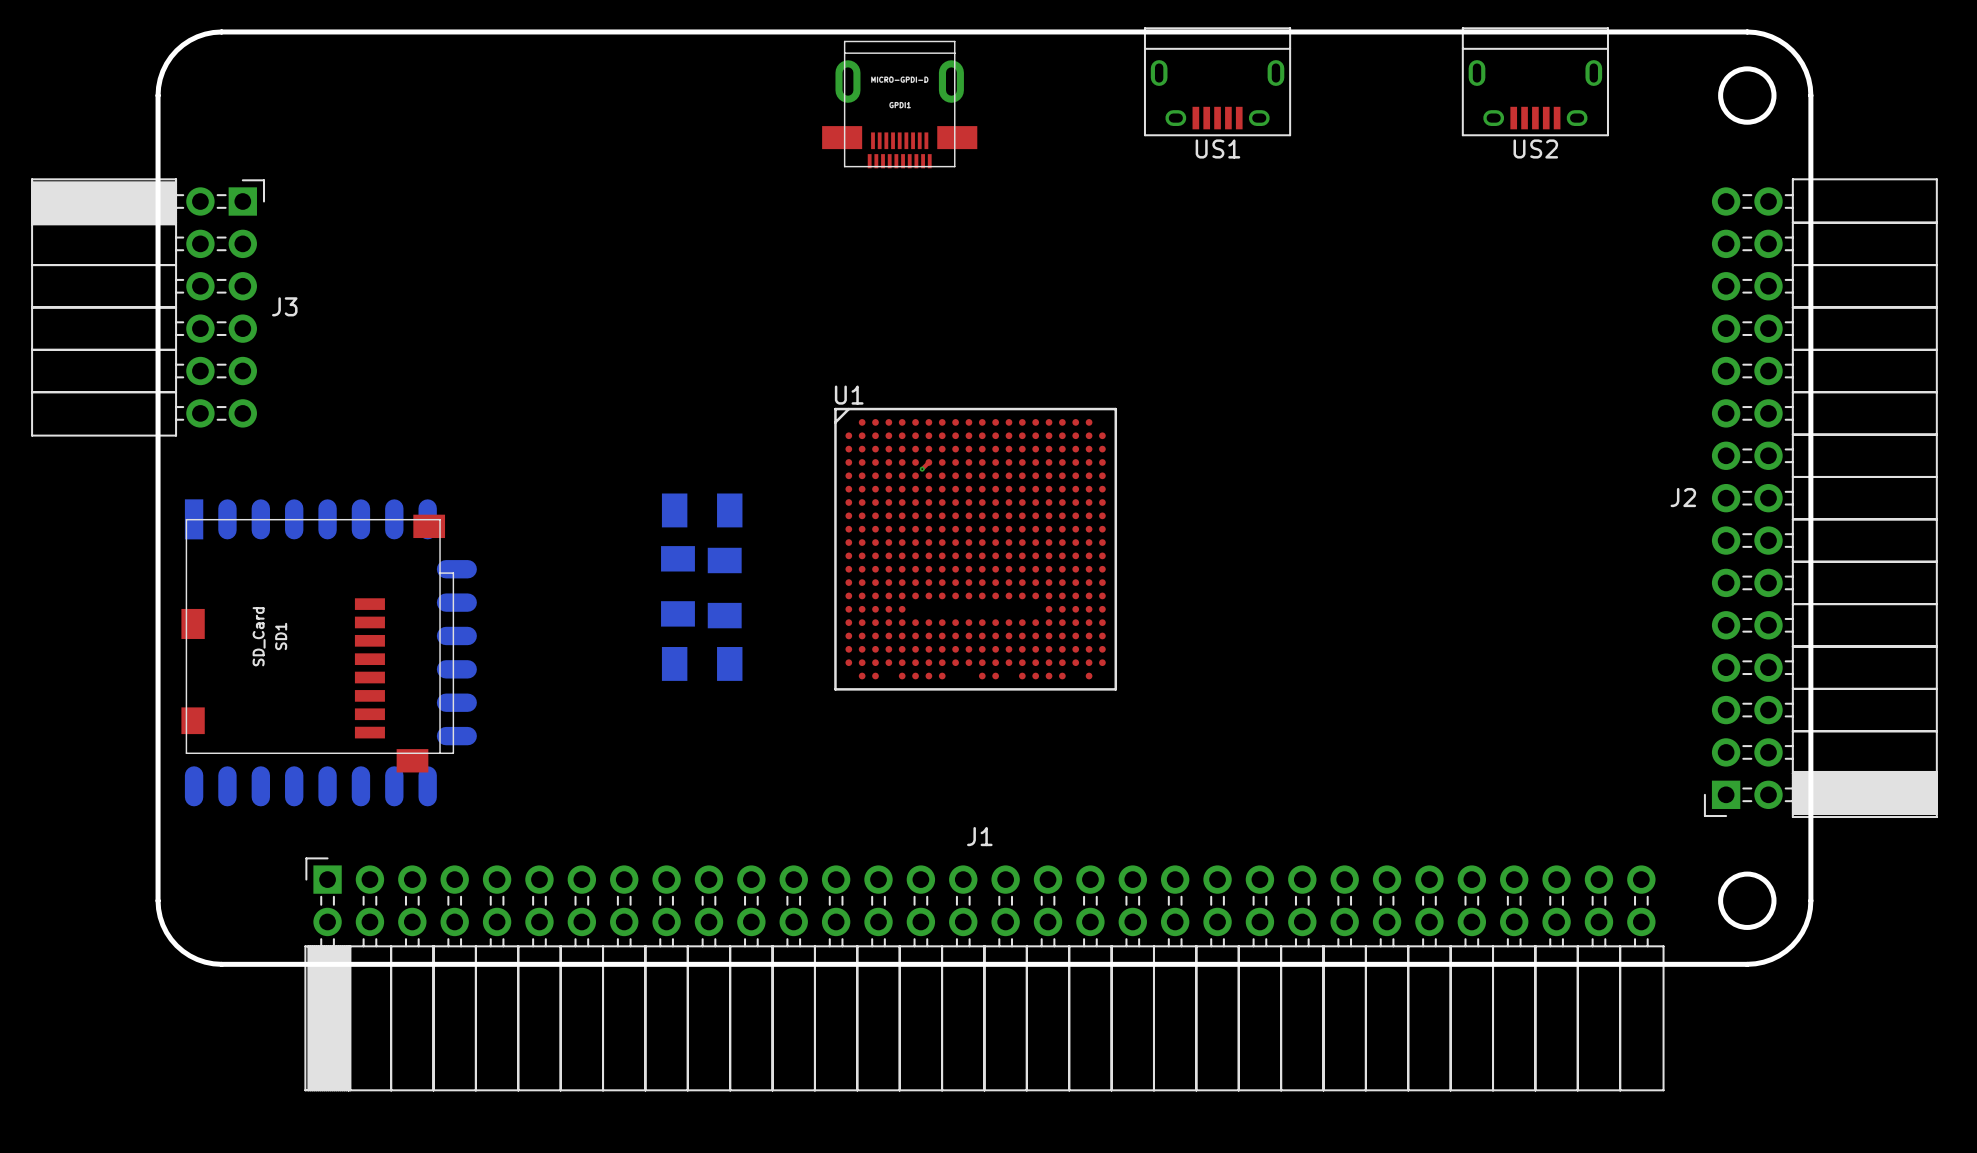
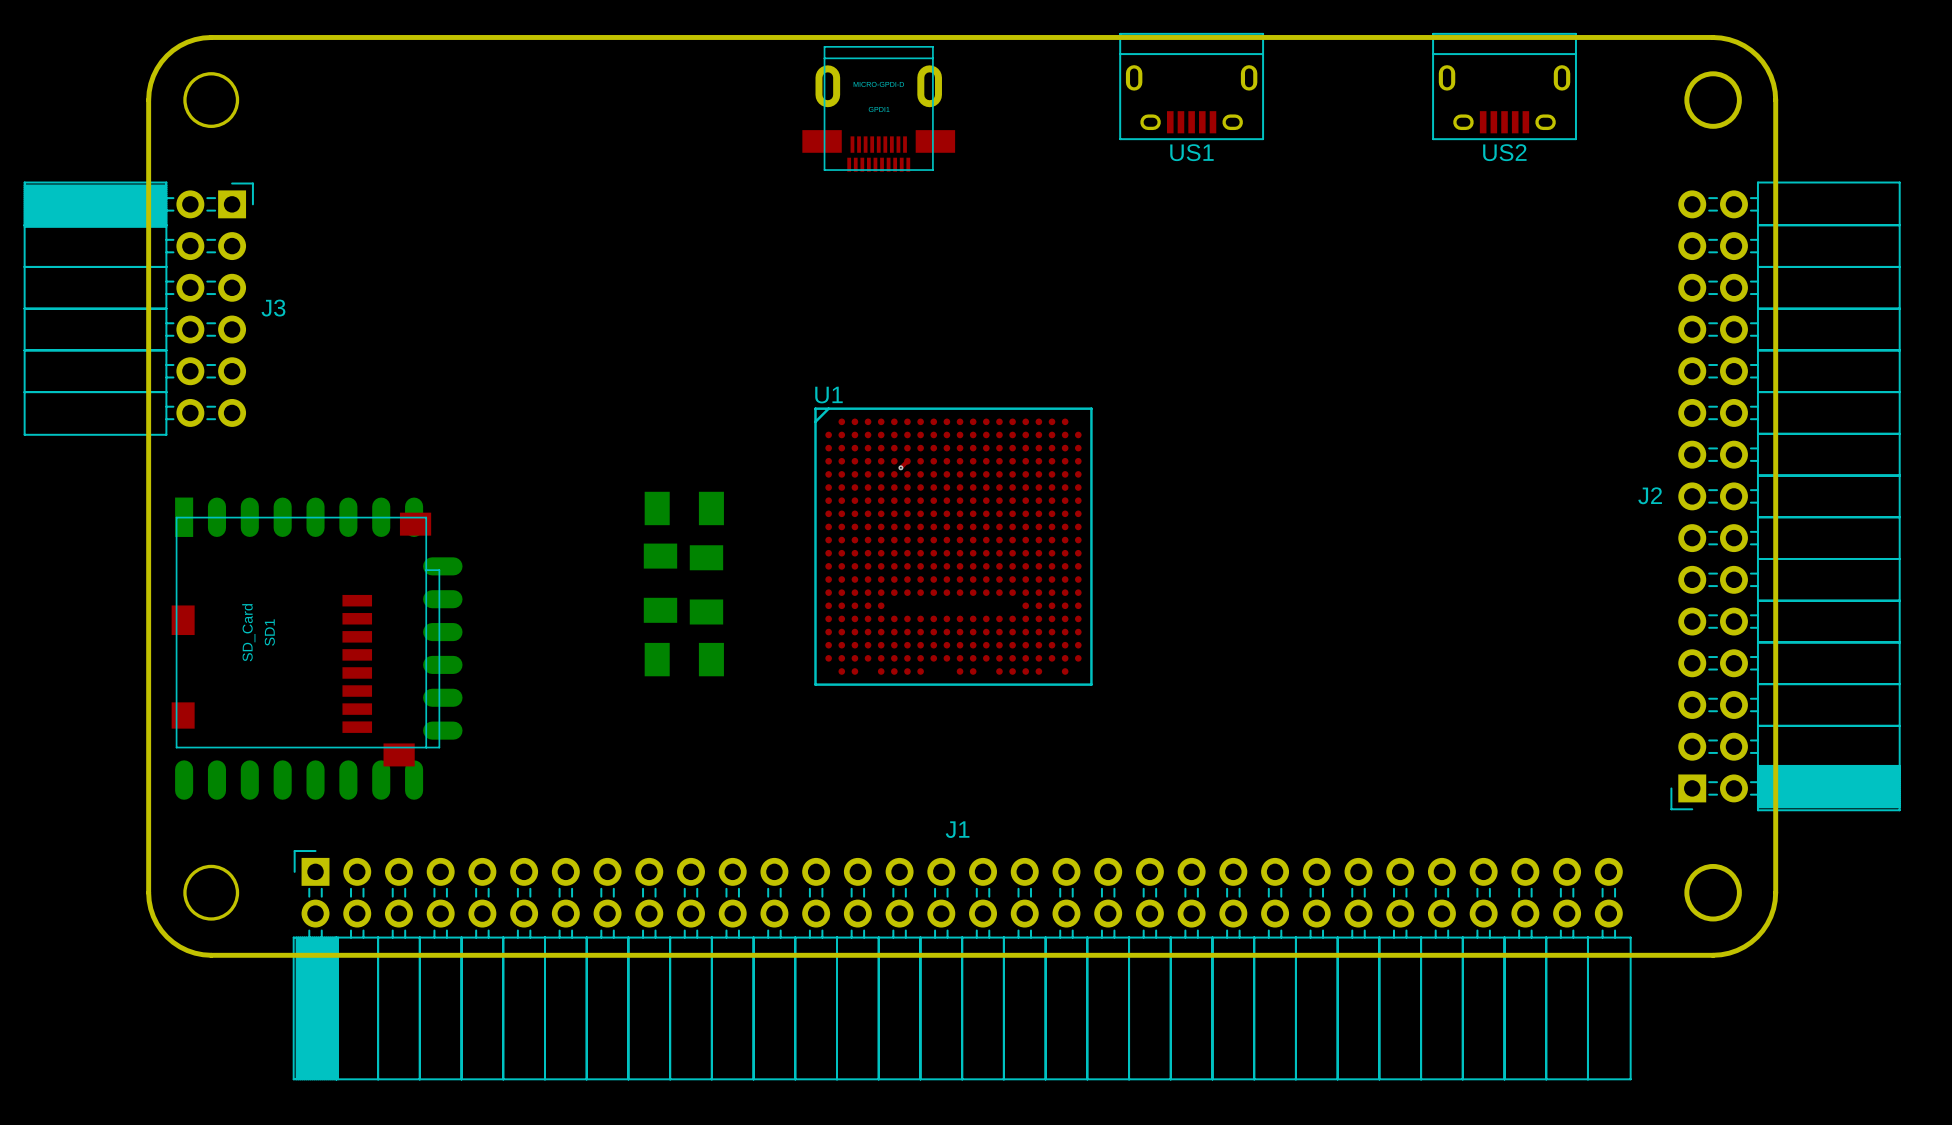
round board edge: none -> [183, 72, 240, 128]
round board edge: none -> [183, 864, 240, 921]

